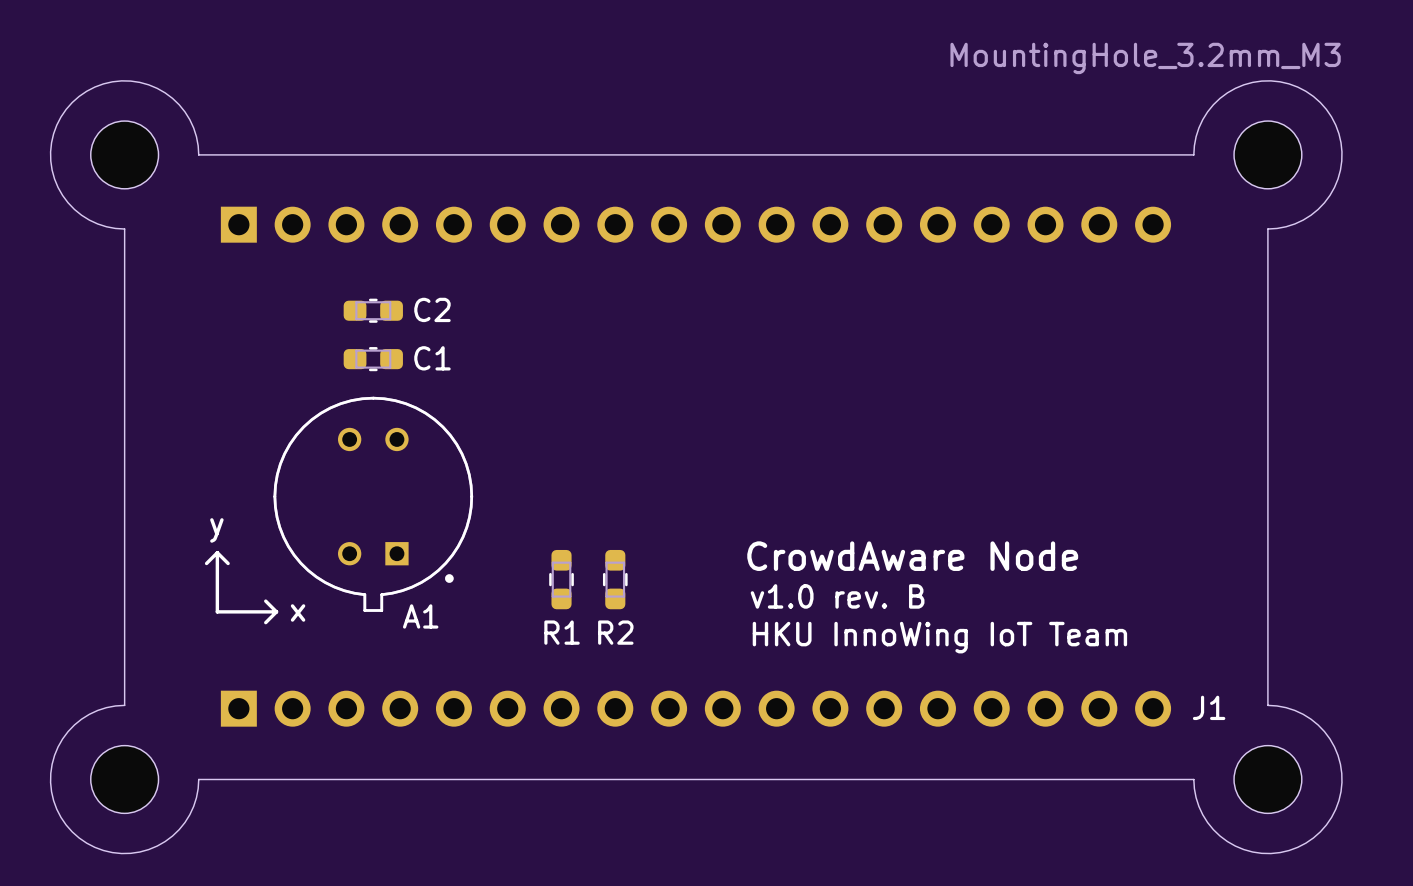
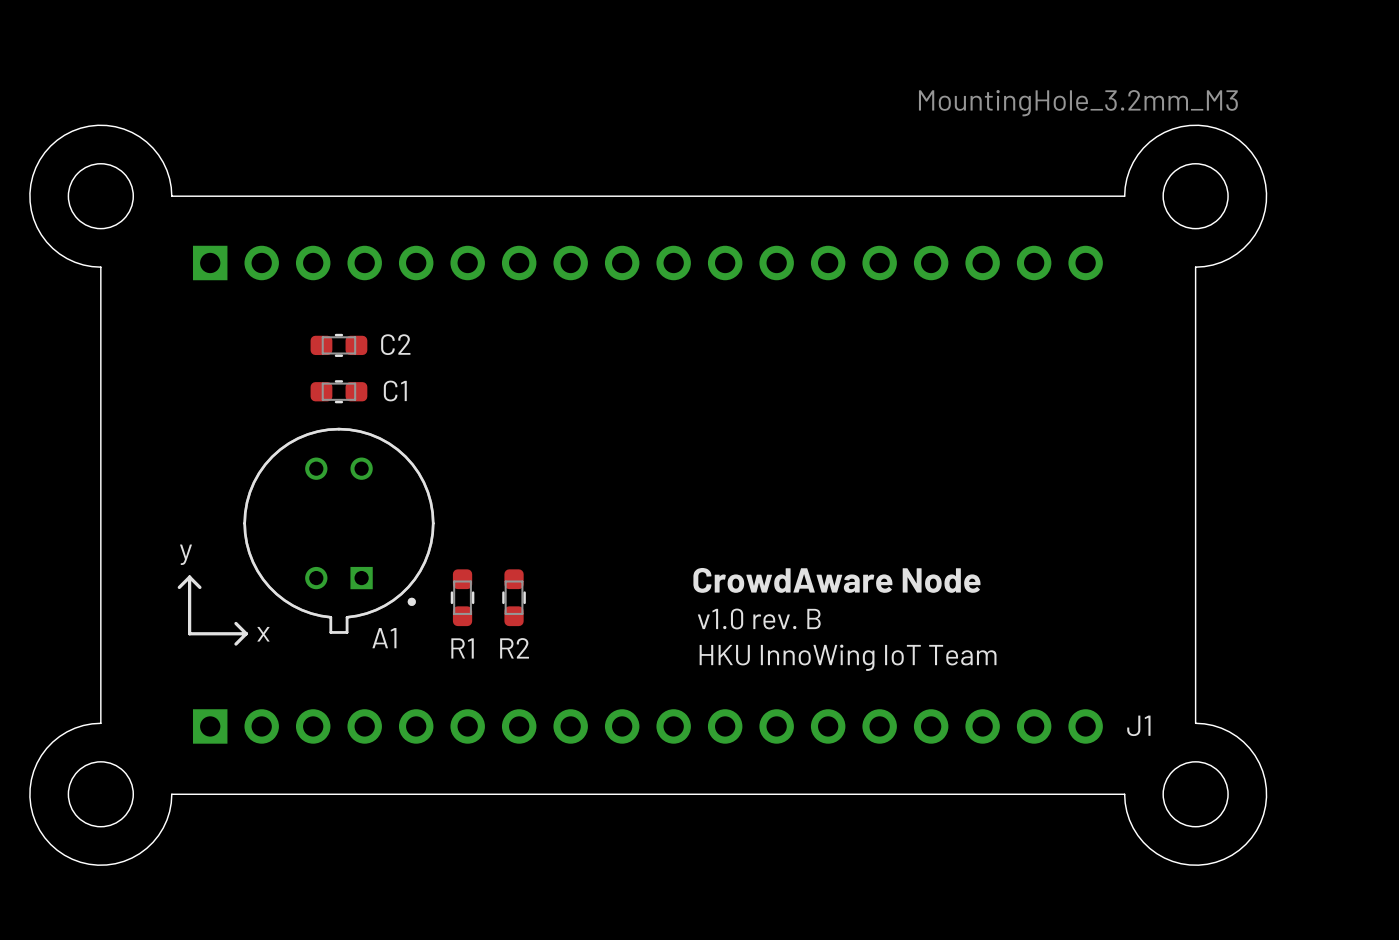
R1 position: (561, 579) -> (462, 597)
R2 position: (615, 579) -> (514, 597)

